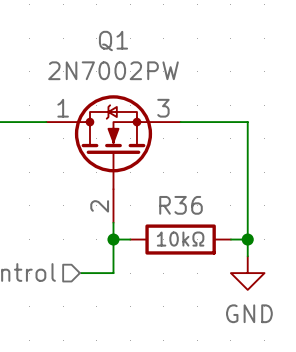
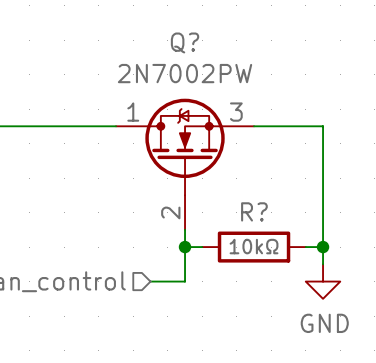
Q1 name: Q1 (113, 41) -> Q? (185, 42)
R36 name: R36 (181, 205) -> R? (254, 211)

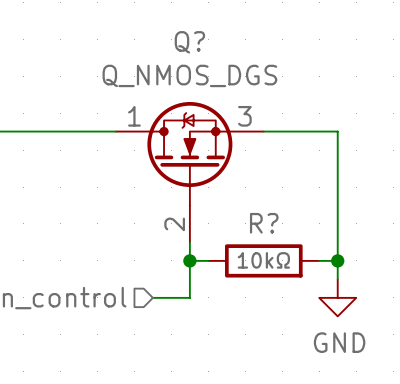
Q? value: 2N7002PW (185, 73) -> Q_NMOS_DGS (189, 75)

